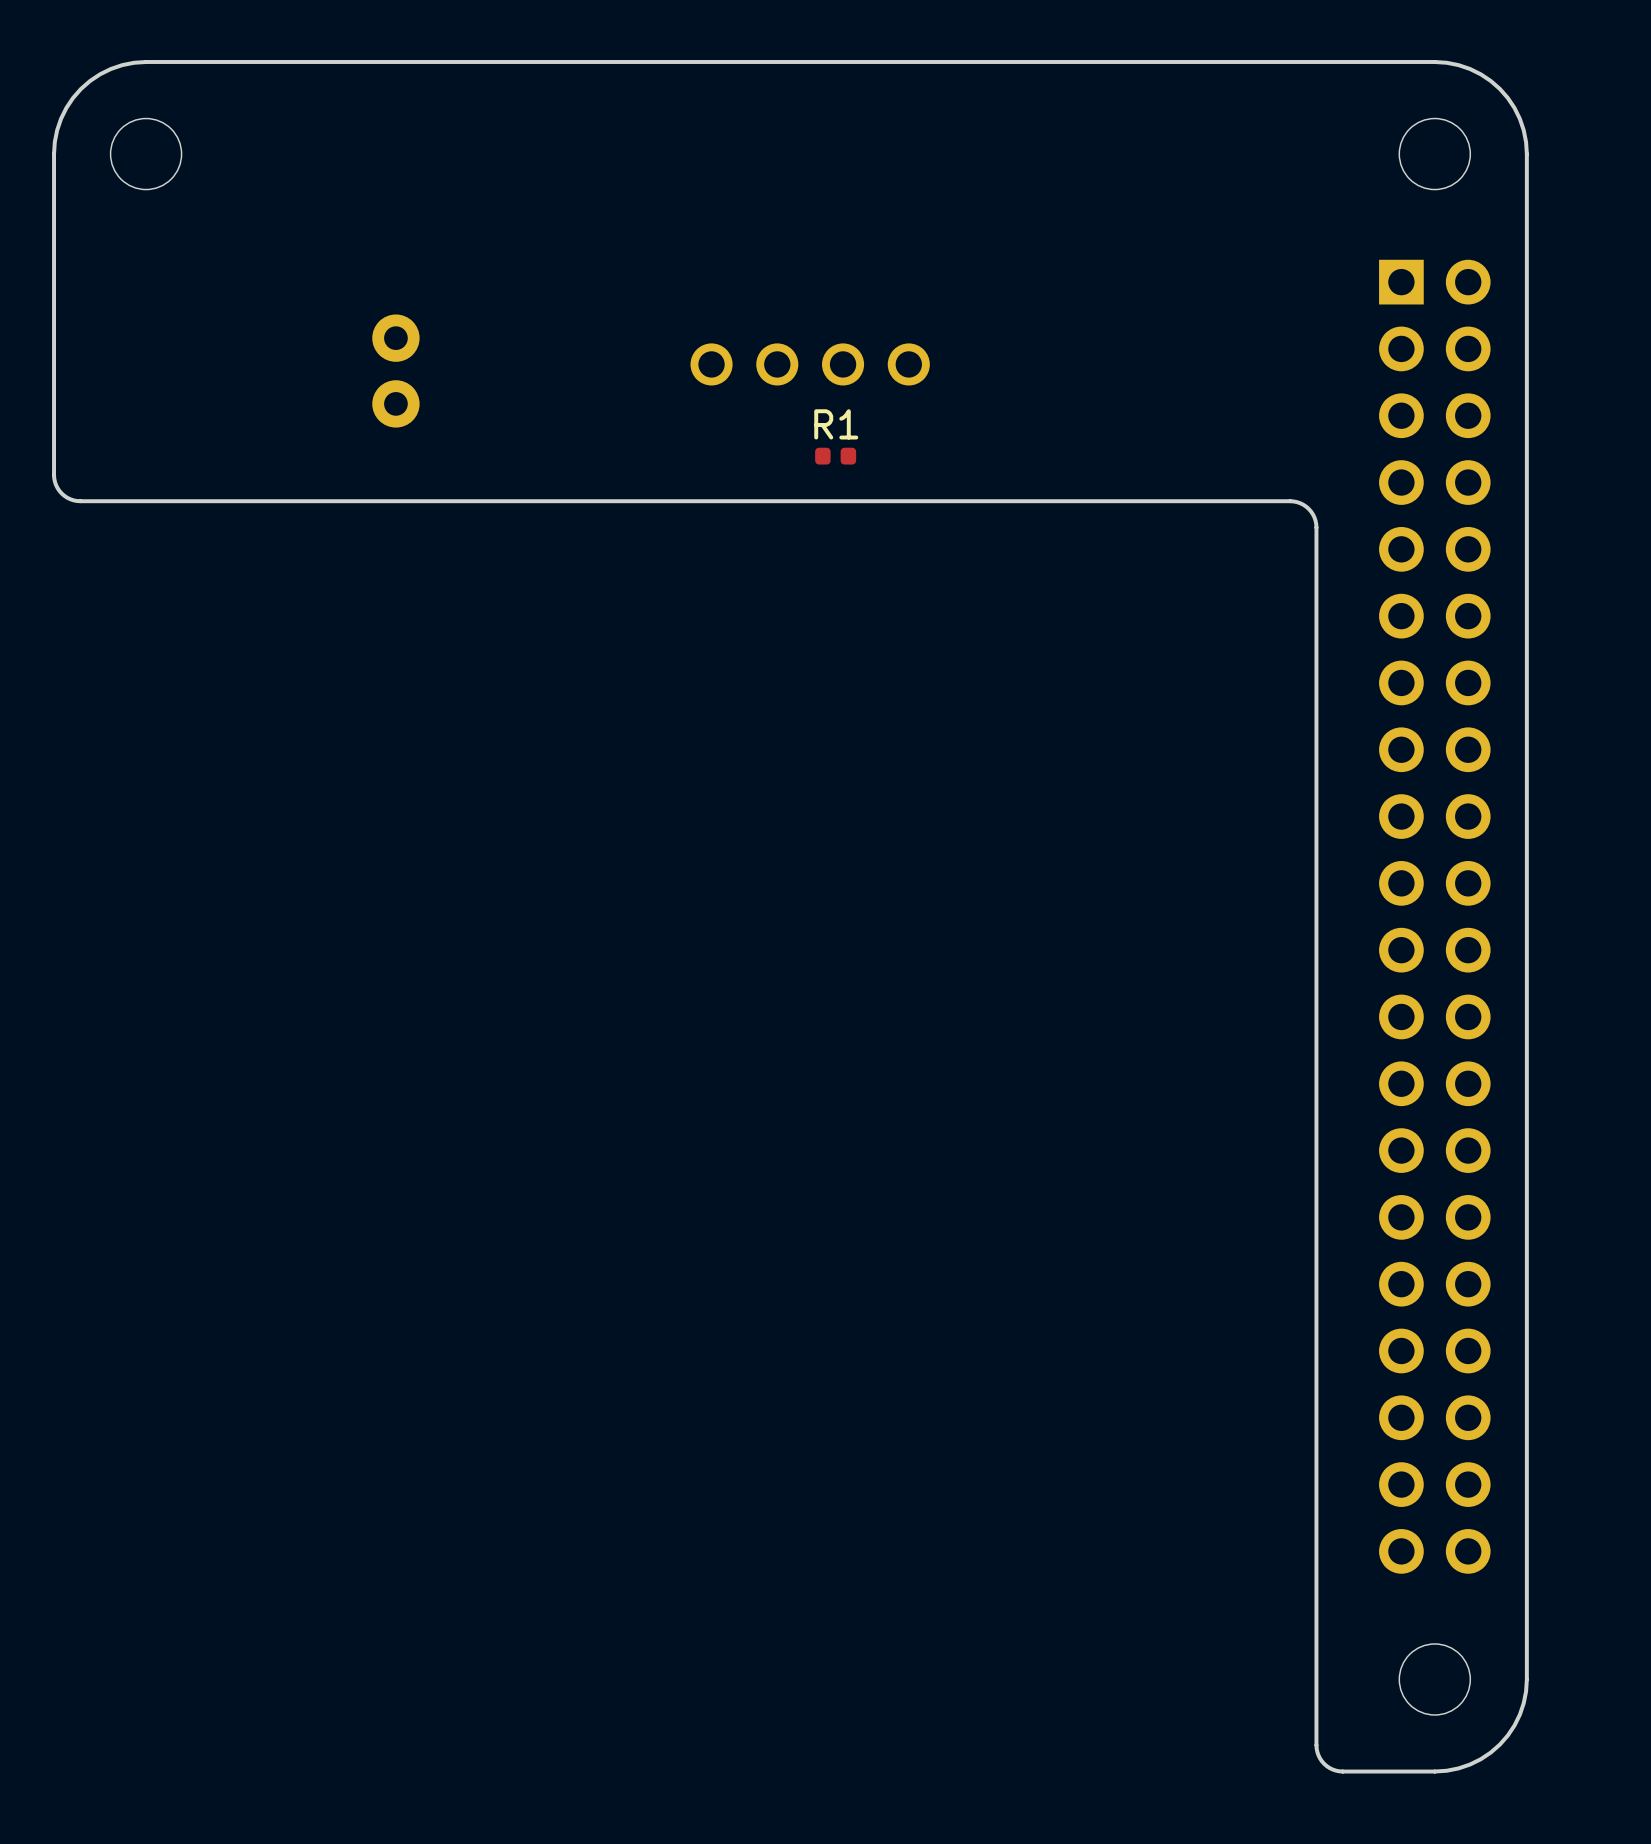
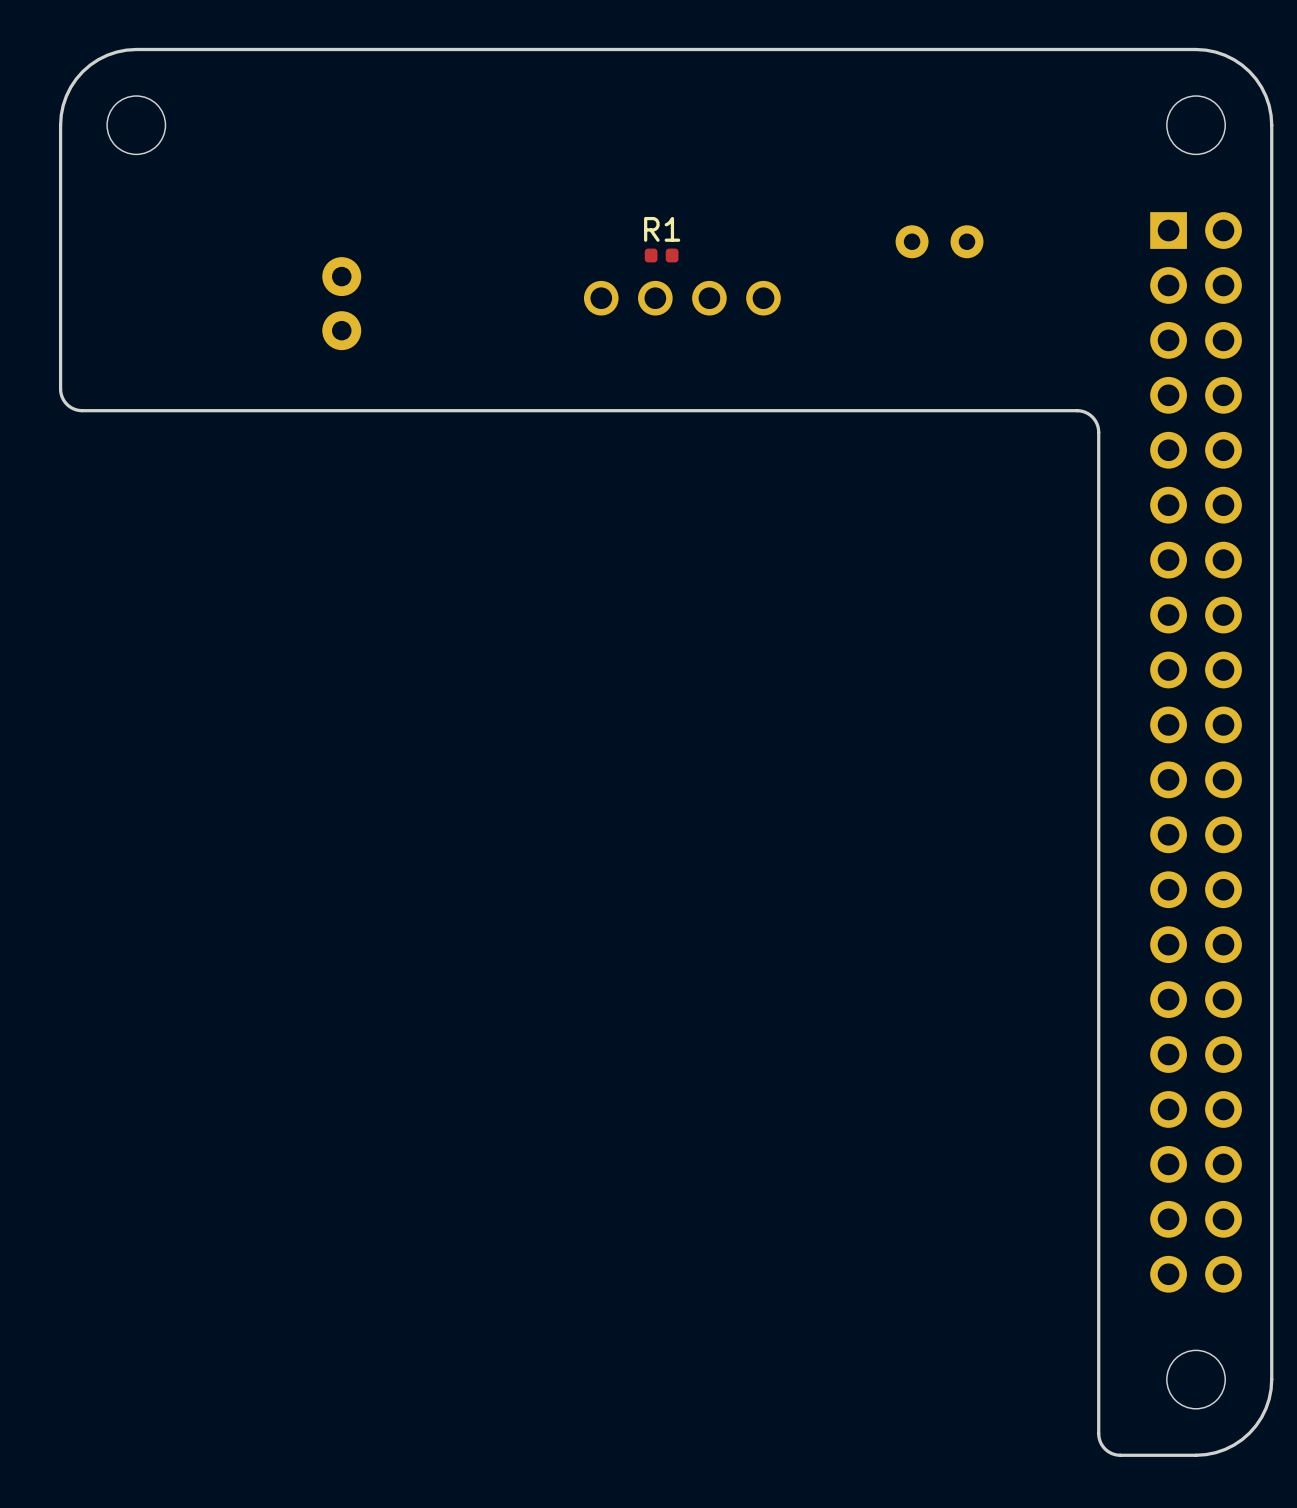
part: none -> (939, 241)
R1 position: (835, 456) -> (661, 255)

